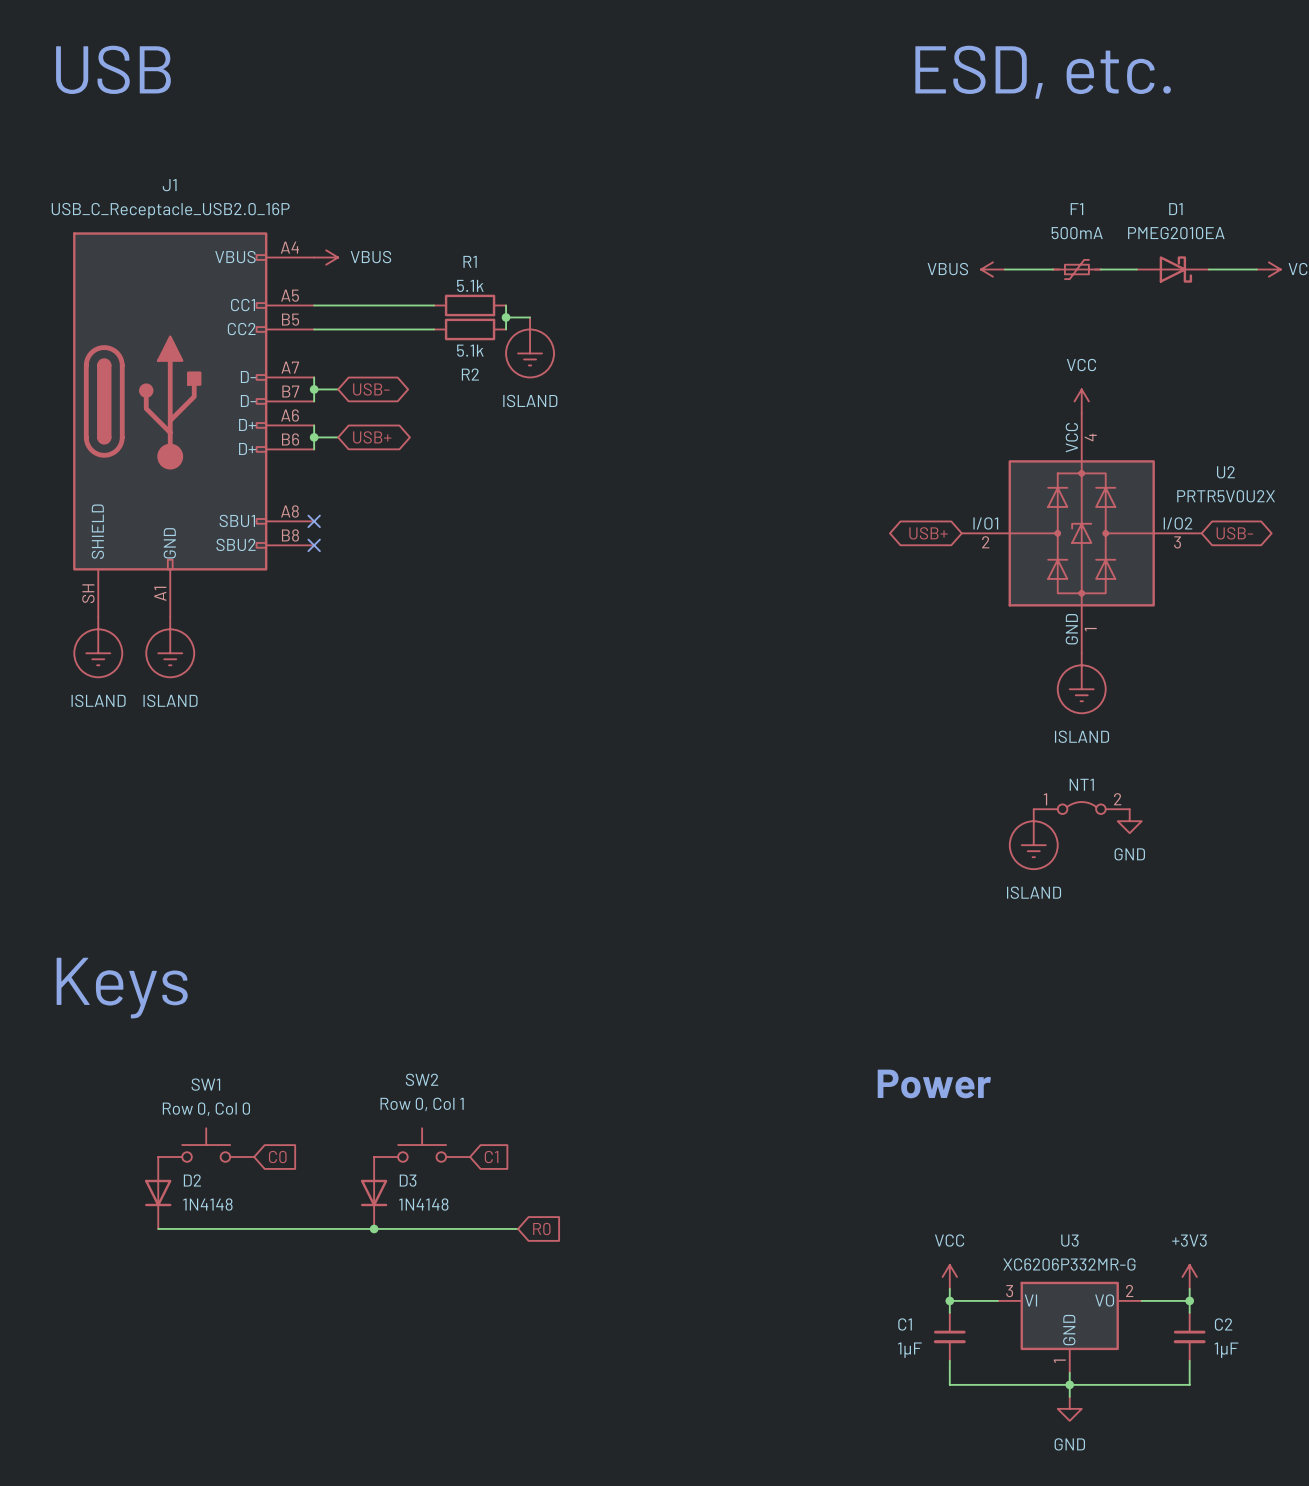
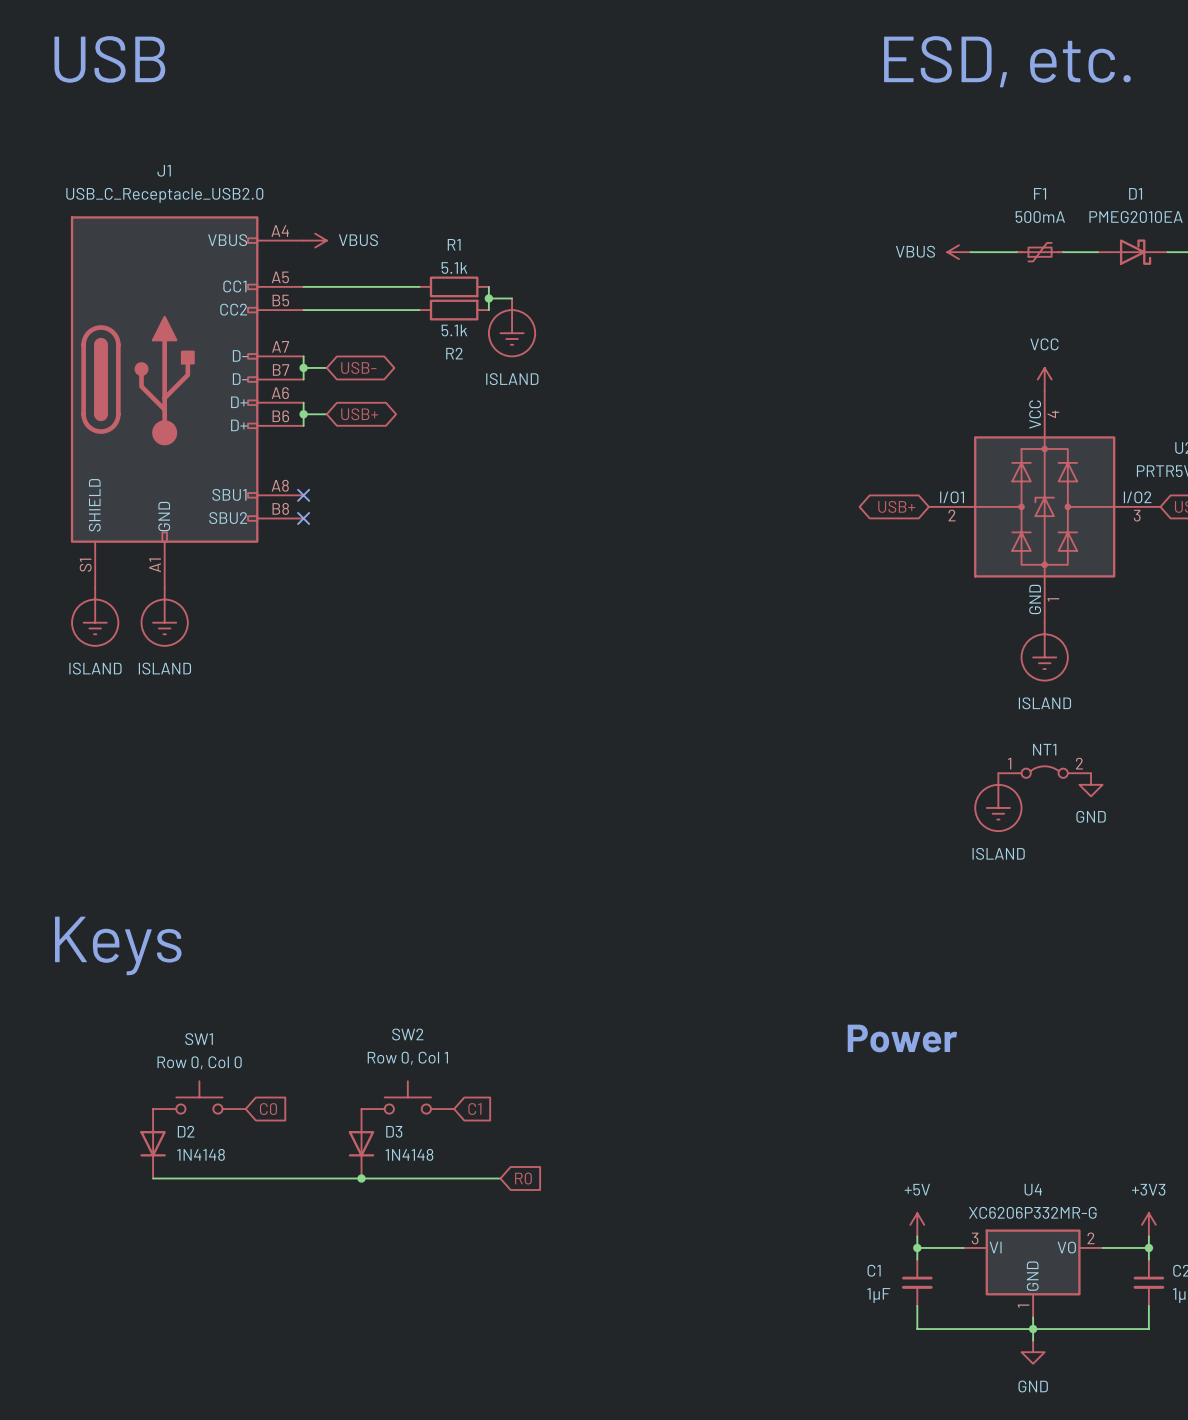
J1 value: USB_C_Receptacle_USB2.0_16P (170, 210) -> USB_C_Receptacle_USB2.0 (164, 195)
J1 pin number: SH (88, 593) -> S1 (85, 565)
U3 name: U3 (1069, 1240) -> U4 (1033, 1189)
power symbol: VCC (949, 1276) -> +5V (917, 1224)

